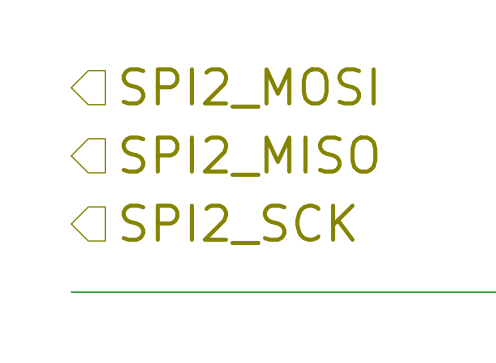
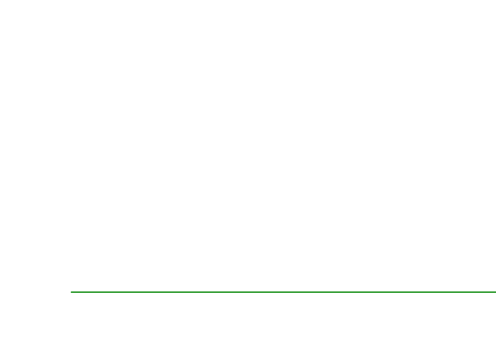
hierarchical label: SPI2_MOSI (248, 88) -> none
hierarchical label: SPI2_MISO (249, 156) -> none
hierarchical label: SPI2_SCK (238, 224) -> none

